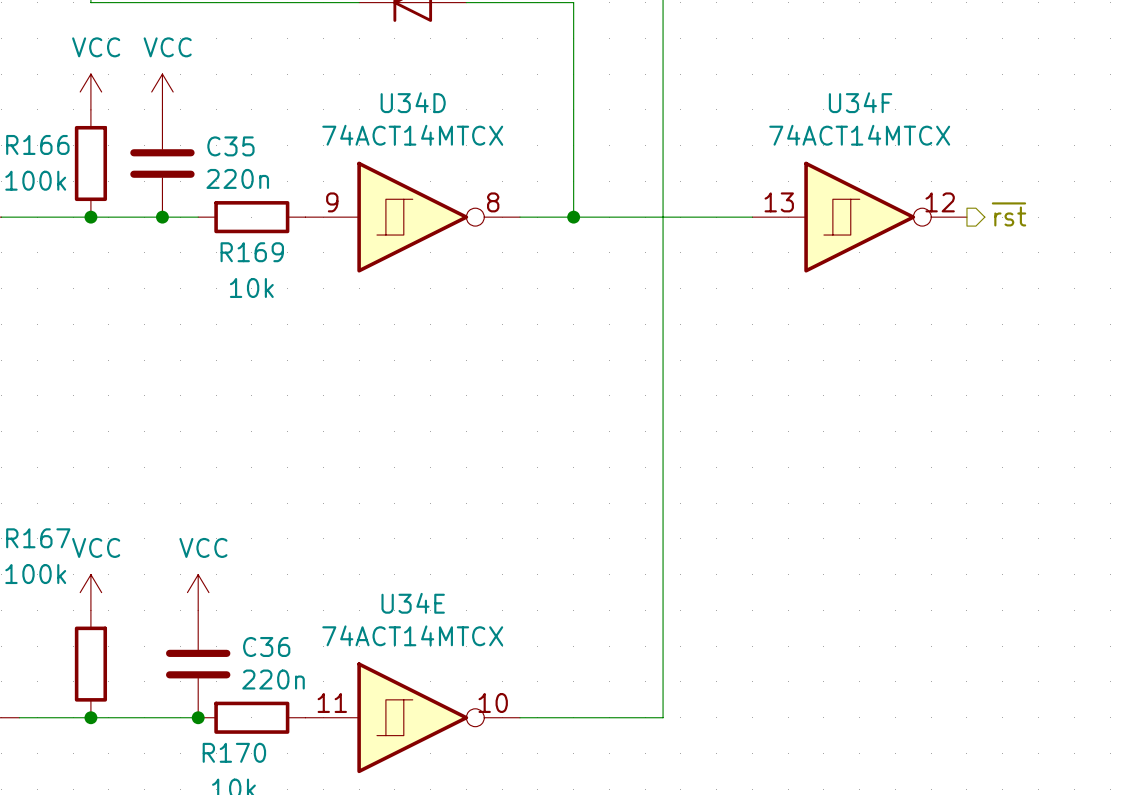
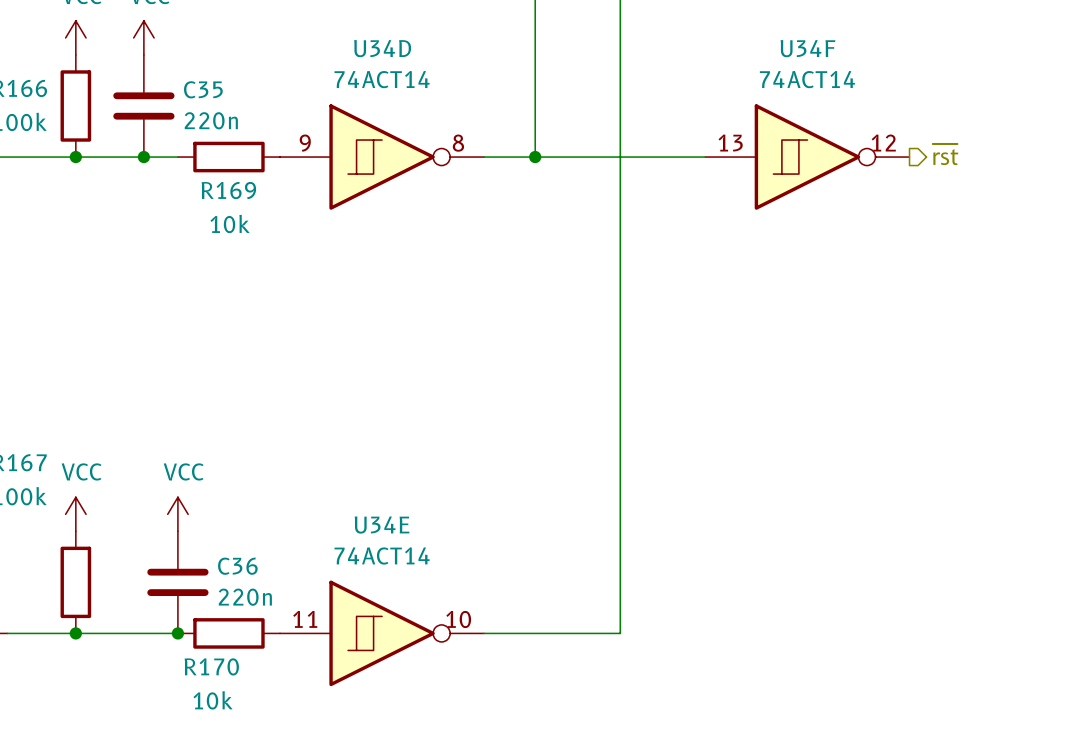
U34D value: 74ACT14MTCX (412, 135) -> 74ACT14 (382, 79)
U34F value: 74ACT14MTCX (859, 135) -> 74ACT14 (807, 79)
U34E value: 74ACT14MTCX (412, 635) -> 74ACT14 (382, 555)

